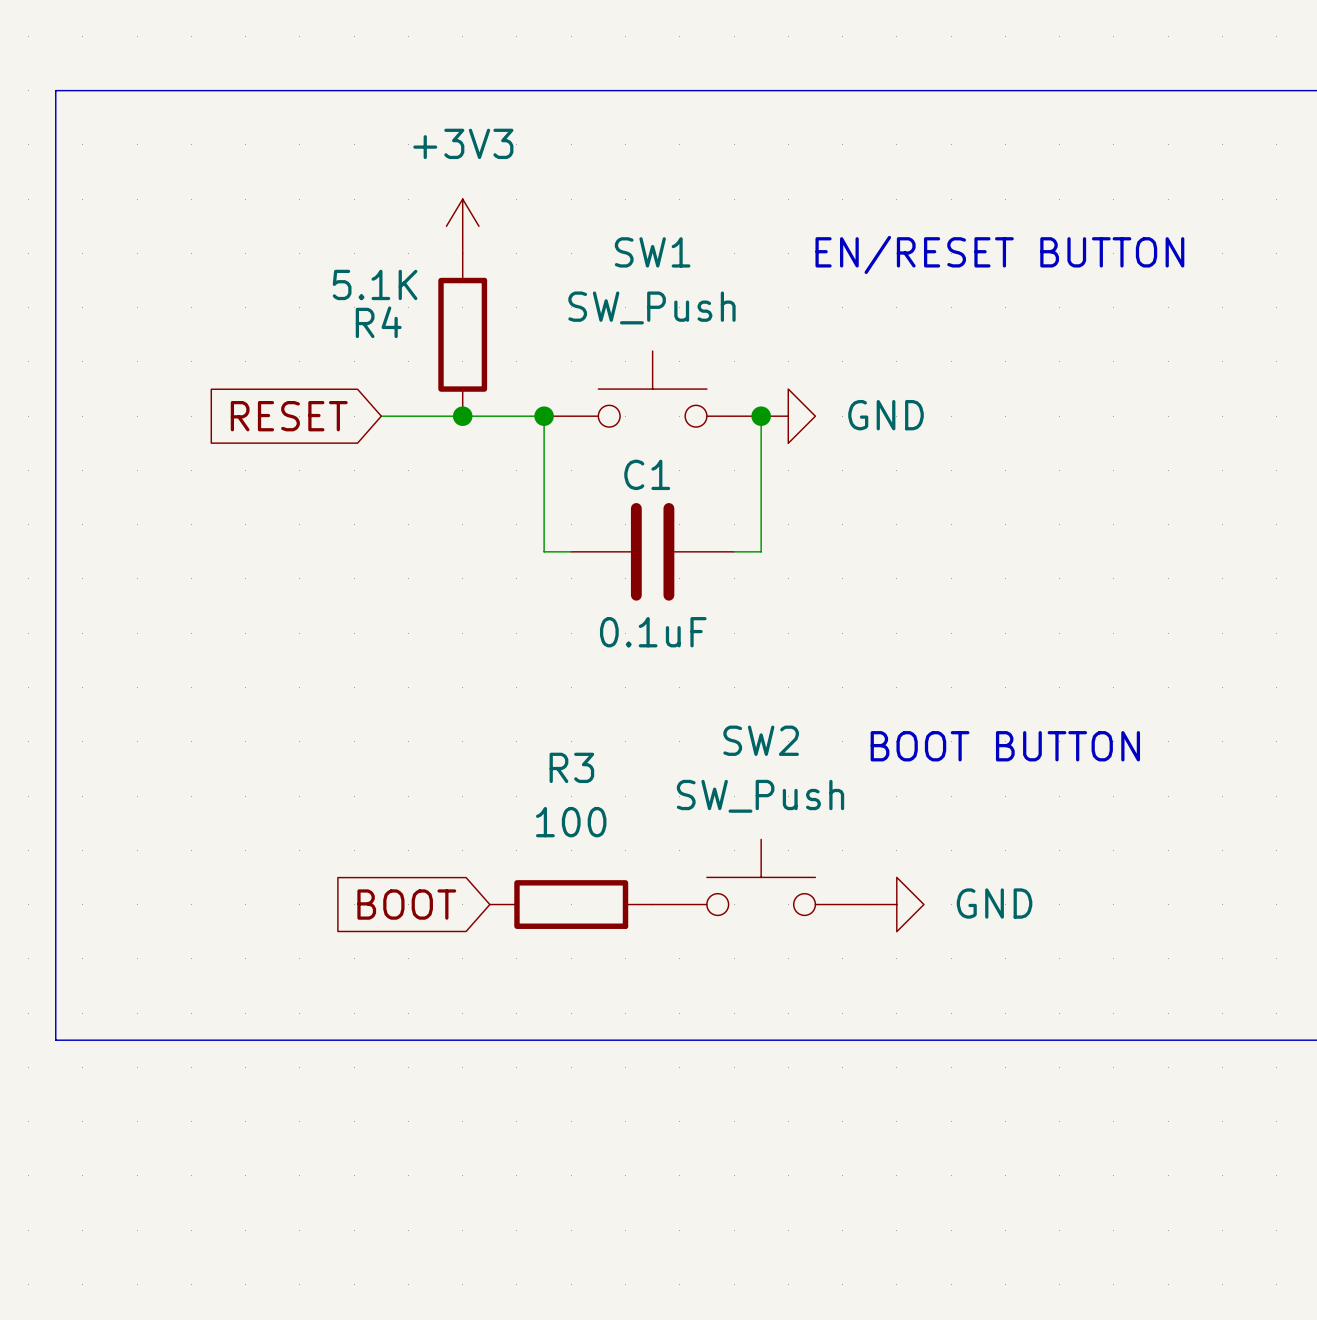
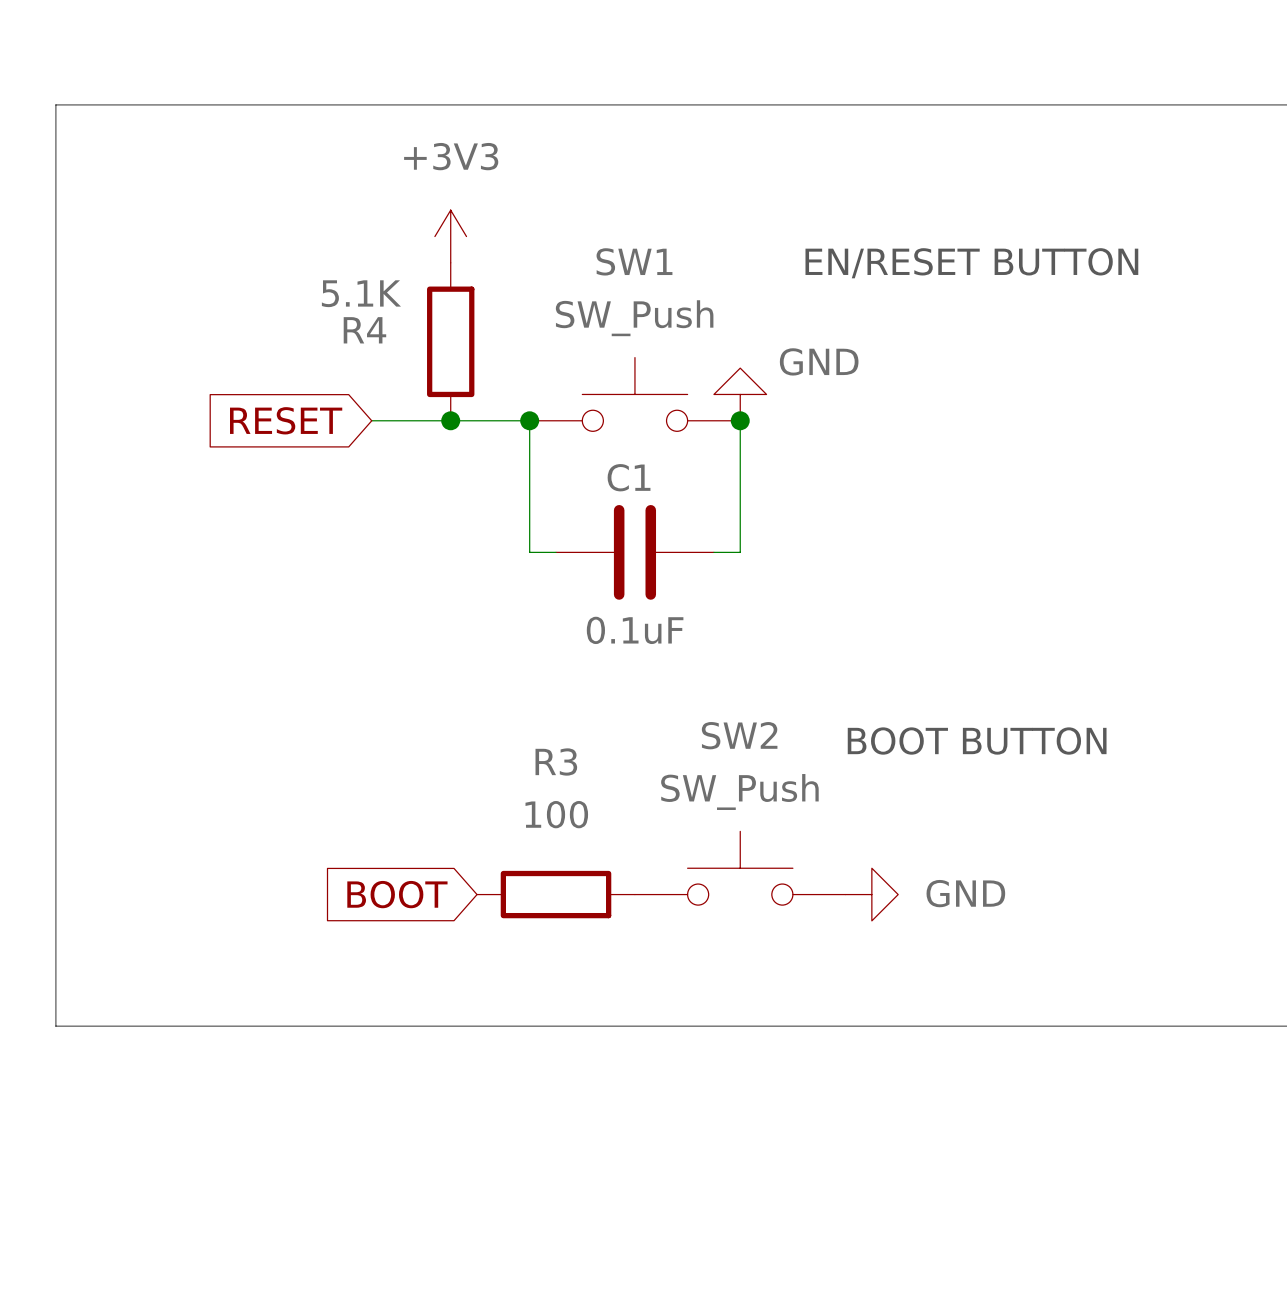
power symbol rotation: 0° (788, 416) -> 90° counterclockwise (740, 394)
power symbol position: GND (788, 416) -> GND (740, 394)

